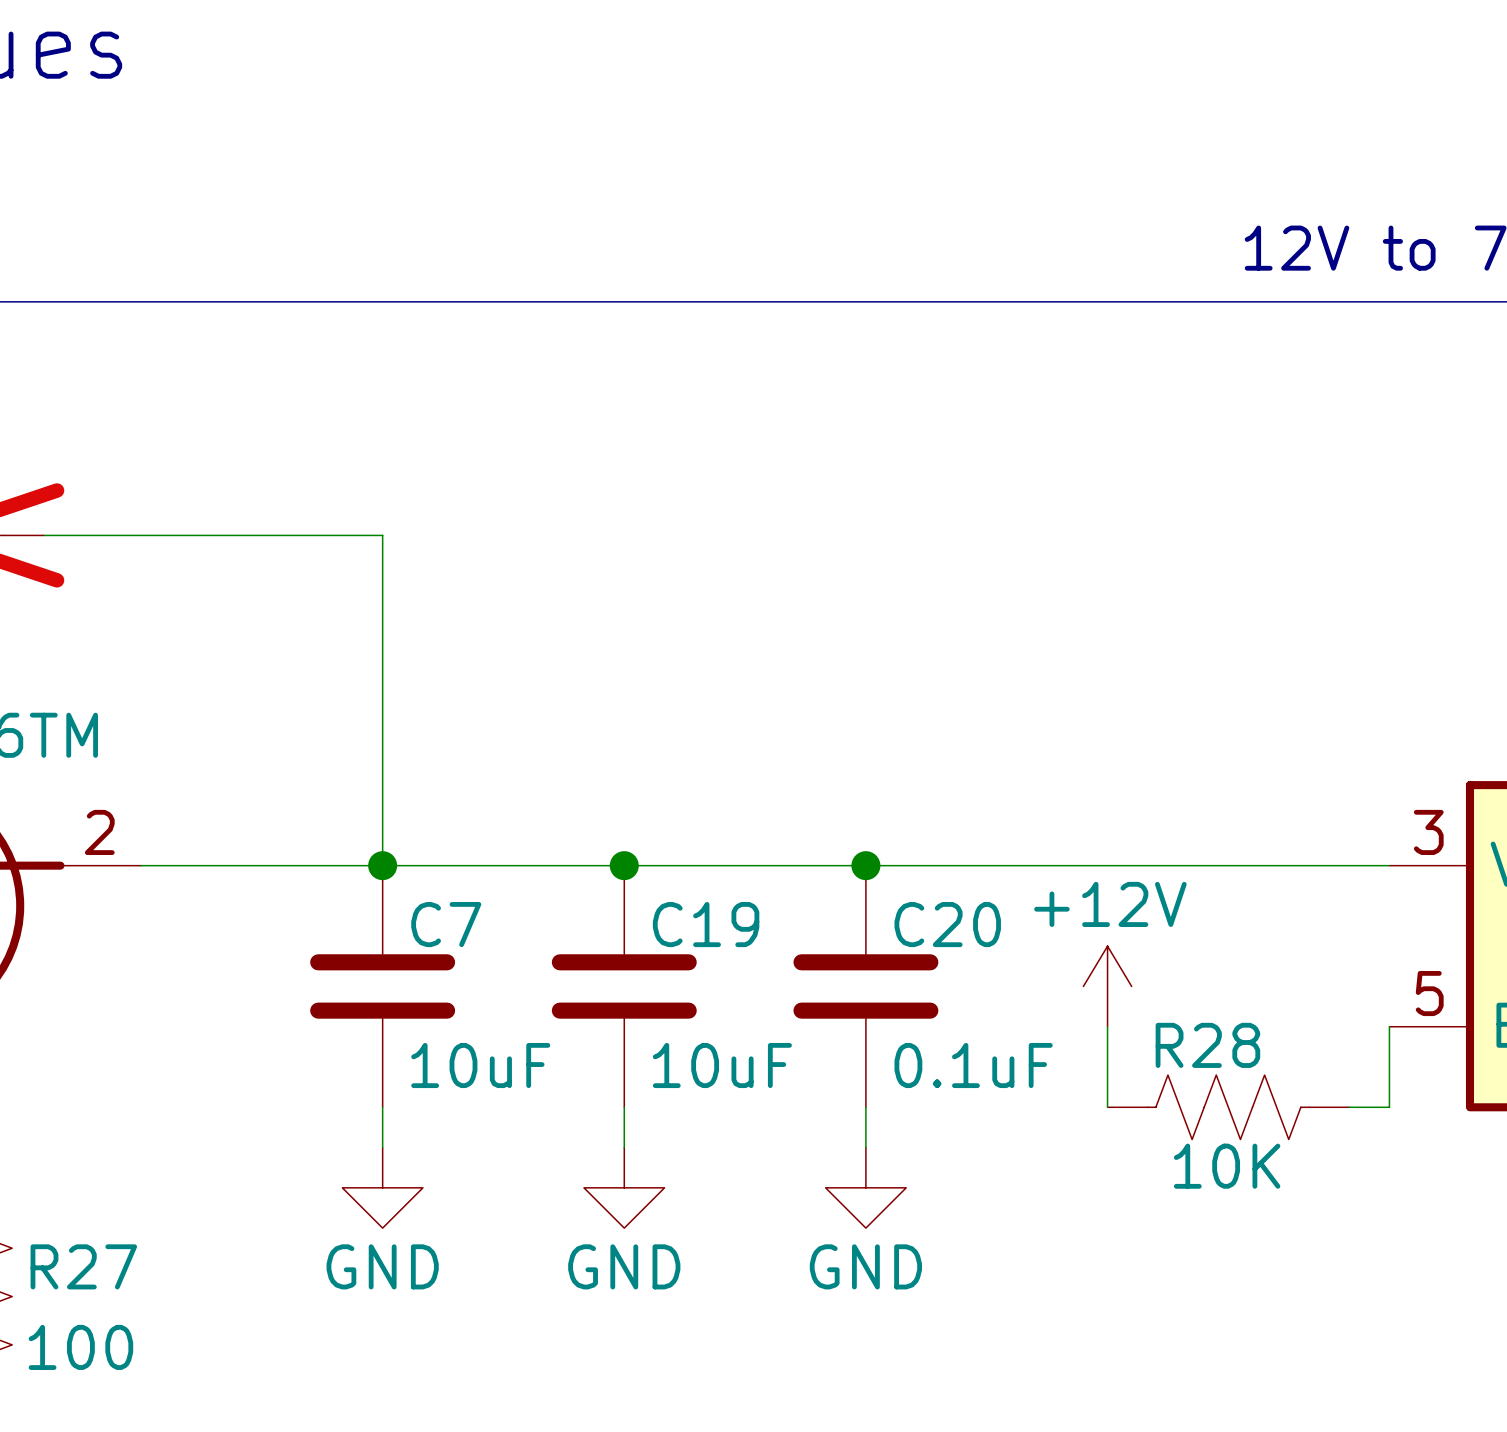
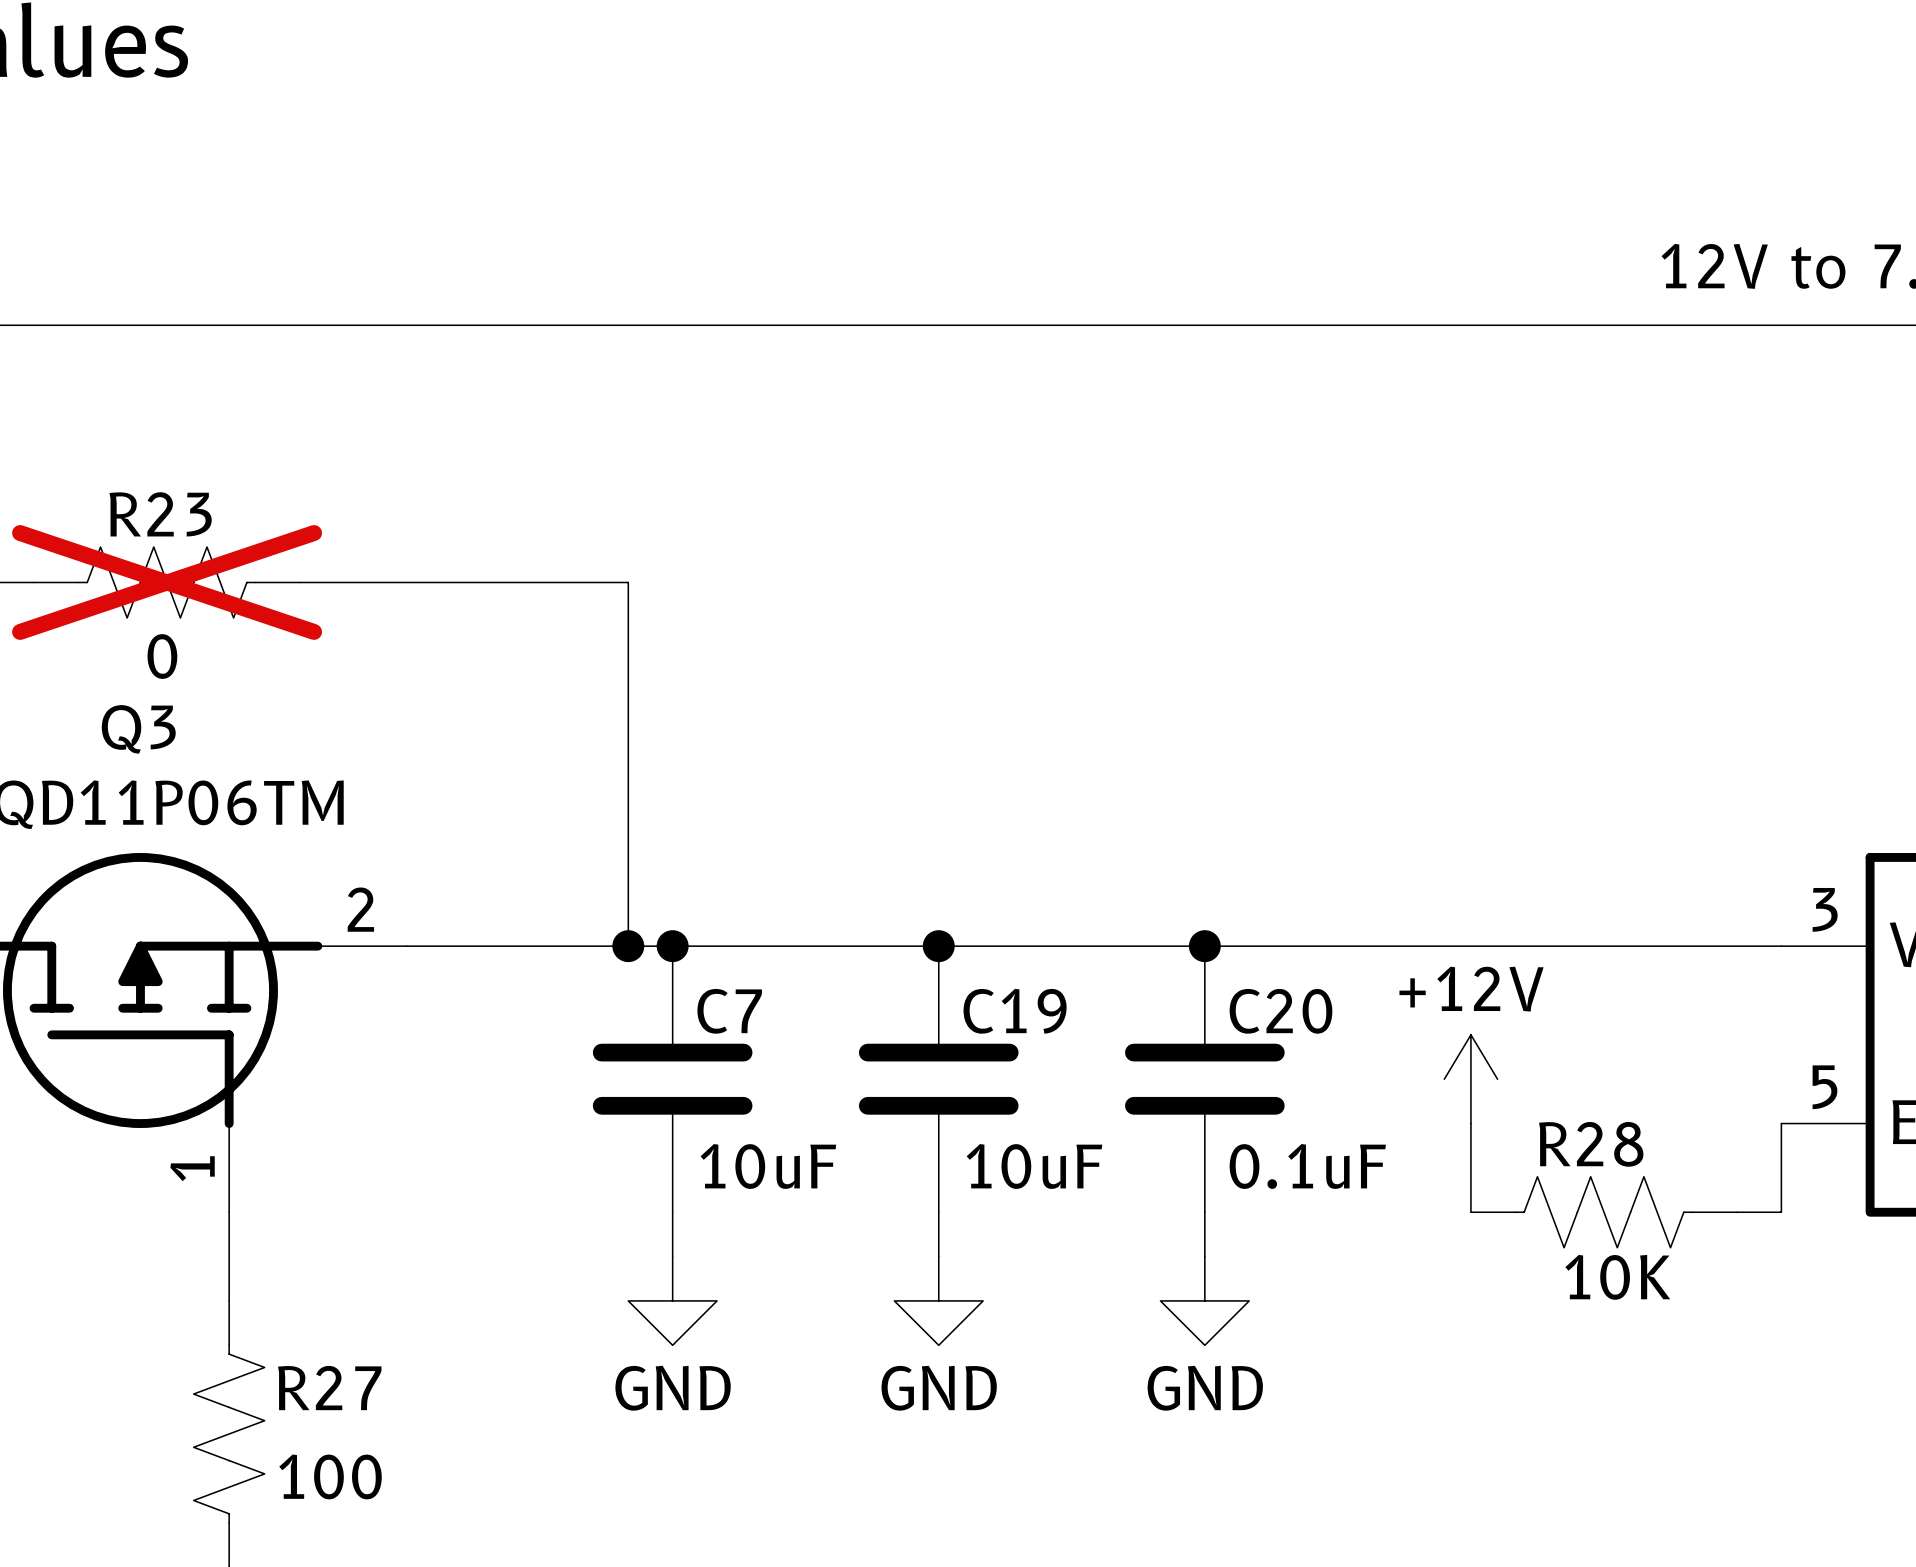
wire: (342, 535) (382, 535) (382, 865) -> (628, 582) (628, 946)
junction: none -> (628, 946)

